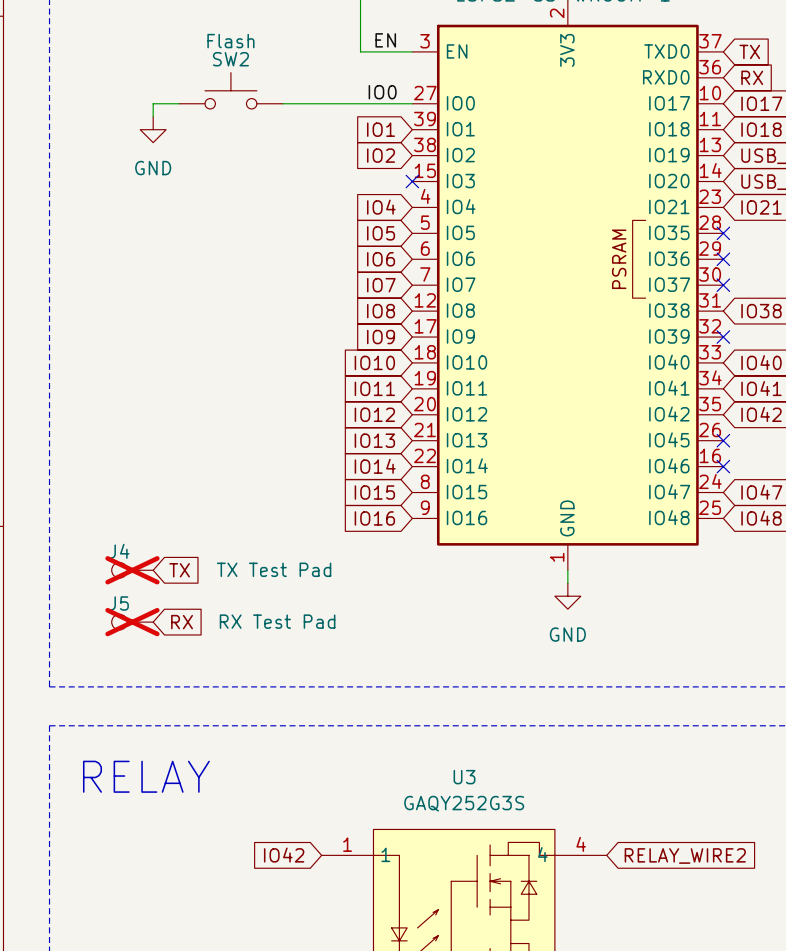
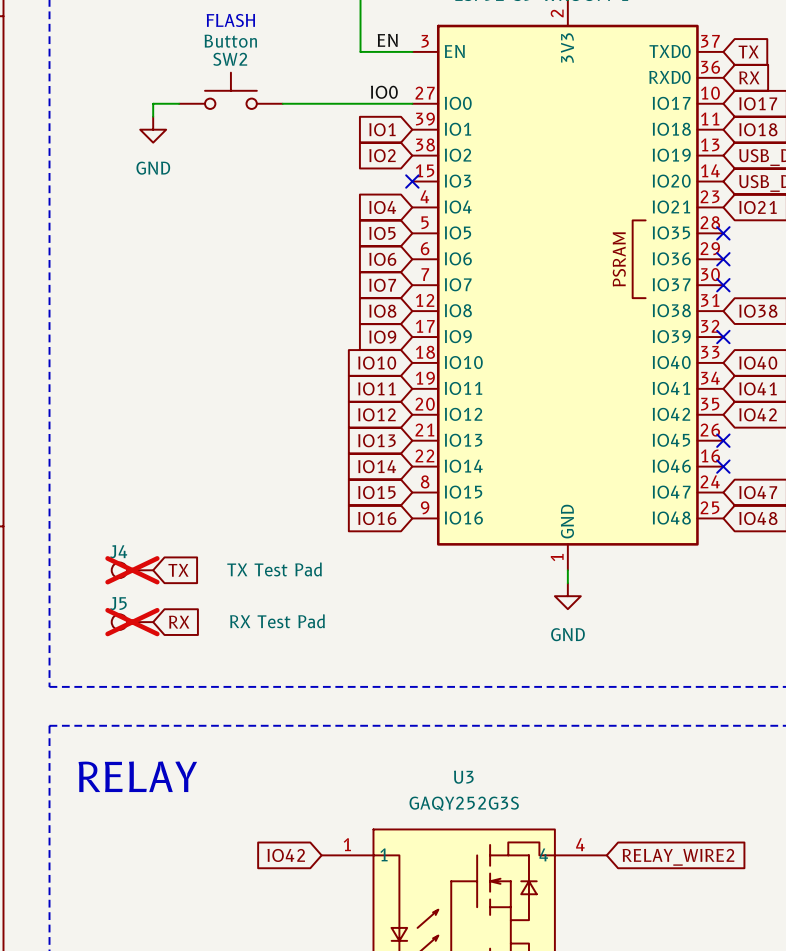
text: none -> FLASH (230, 20)
SW2 value: Flash (230, 41) -> Button (230, 41)

